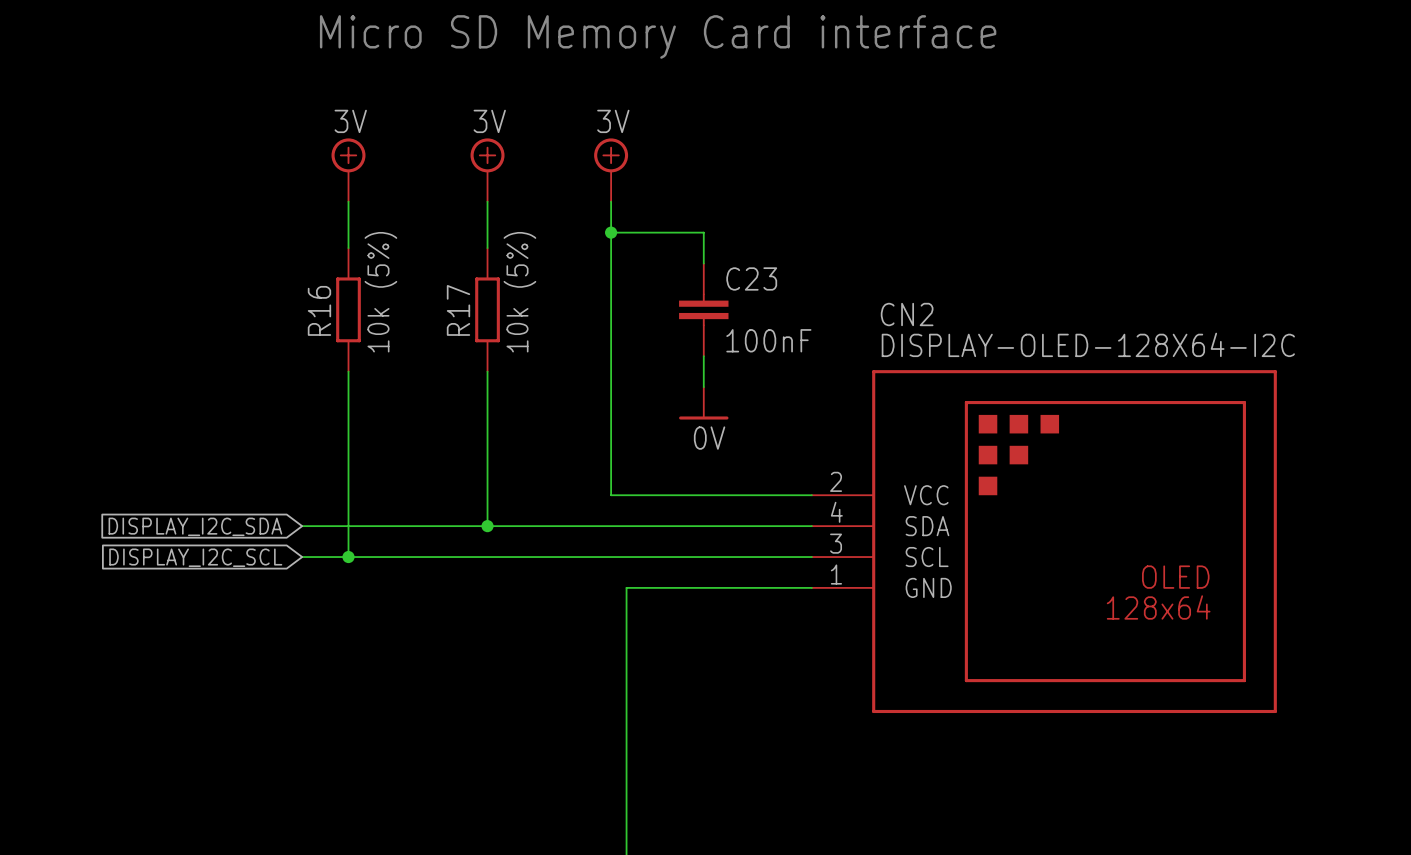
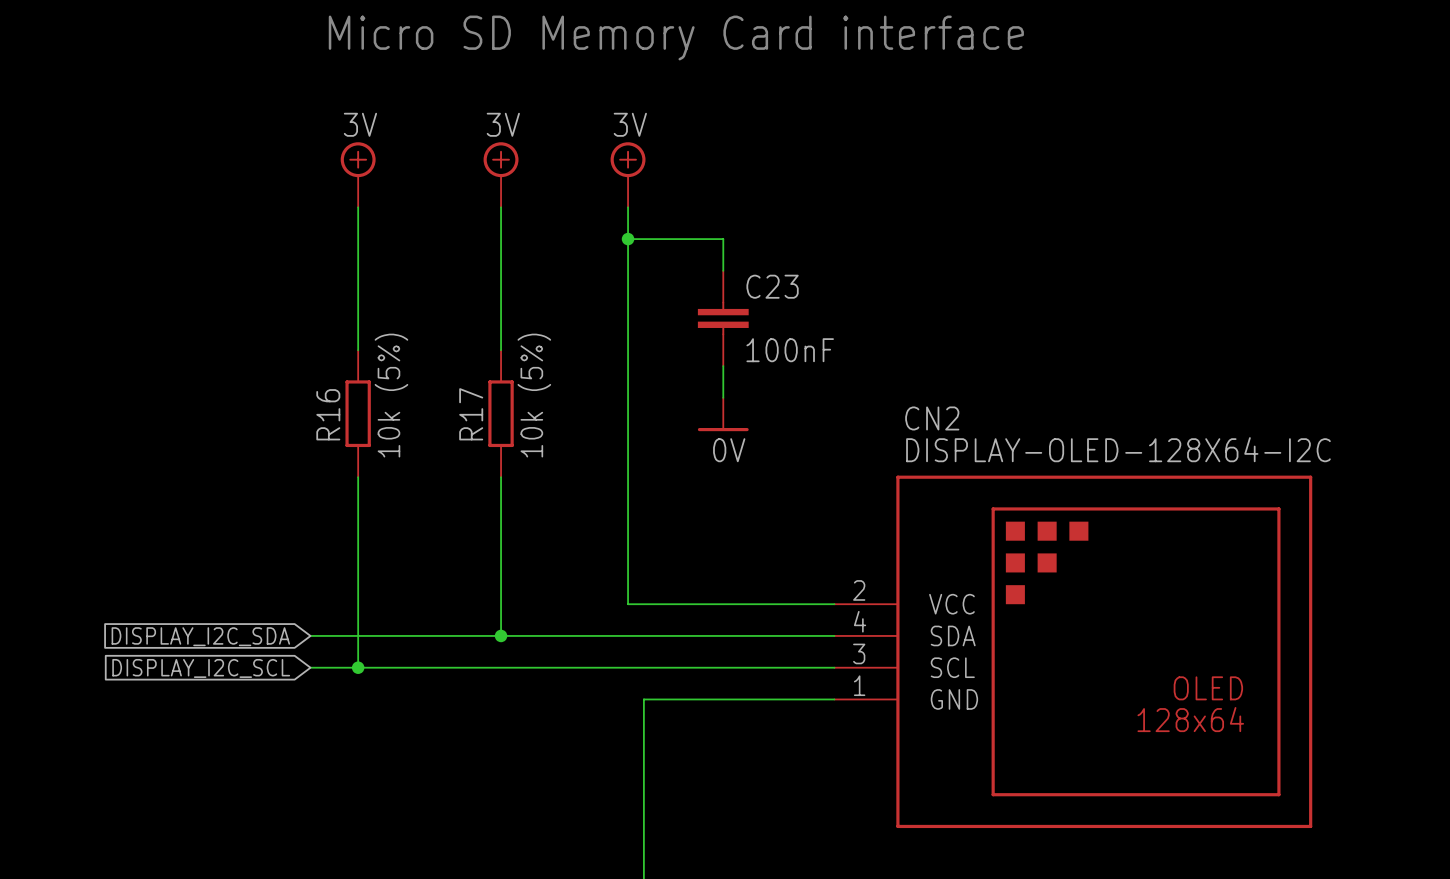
R16 position: (348, 309) -> (358, 413)
R17 position: (487, 309) -> (501, 413)
wire: (348, 371) (348, 464) -> (358, 254) (358, 350)
wire: (487, 371) (487, 464) -> (501, 254) (501, 350)
wire: (611, 495) (811, 495) -> none
global label position: DISPLAY_I2C_SDA (195, 526) -> DISPLAY_I2C_SDA (200, 636)
wire: (302, 526) (811, 526) -> (310, 635) (834, 635)
wire: none -> (501, 540) (501, 635)
junction: (487, 526) -> none
CN2 position: (1044, 541) -> (1073, 651)
global label position: DISPLAY_I2C_SCL (195, 557) -> DISPLAY_I2C_SCL (201, 668)
wire: (302, 557) (811, 557) -> (310, 667) (834, 667)
wire: none -> (358, 572) (358, 667)
junction: (348, 557) -> none
wire: (626, 587) (626, 680) -> (643, 604) (628, 604) (628, 508)
junction: none -> (501, 635)
junction: none -> (358, 667)
wire: none -> (643, 699) (834, 699)

